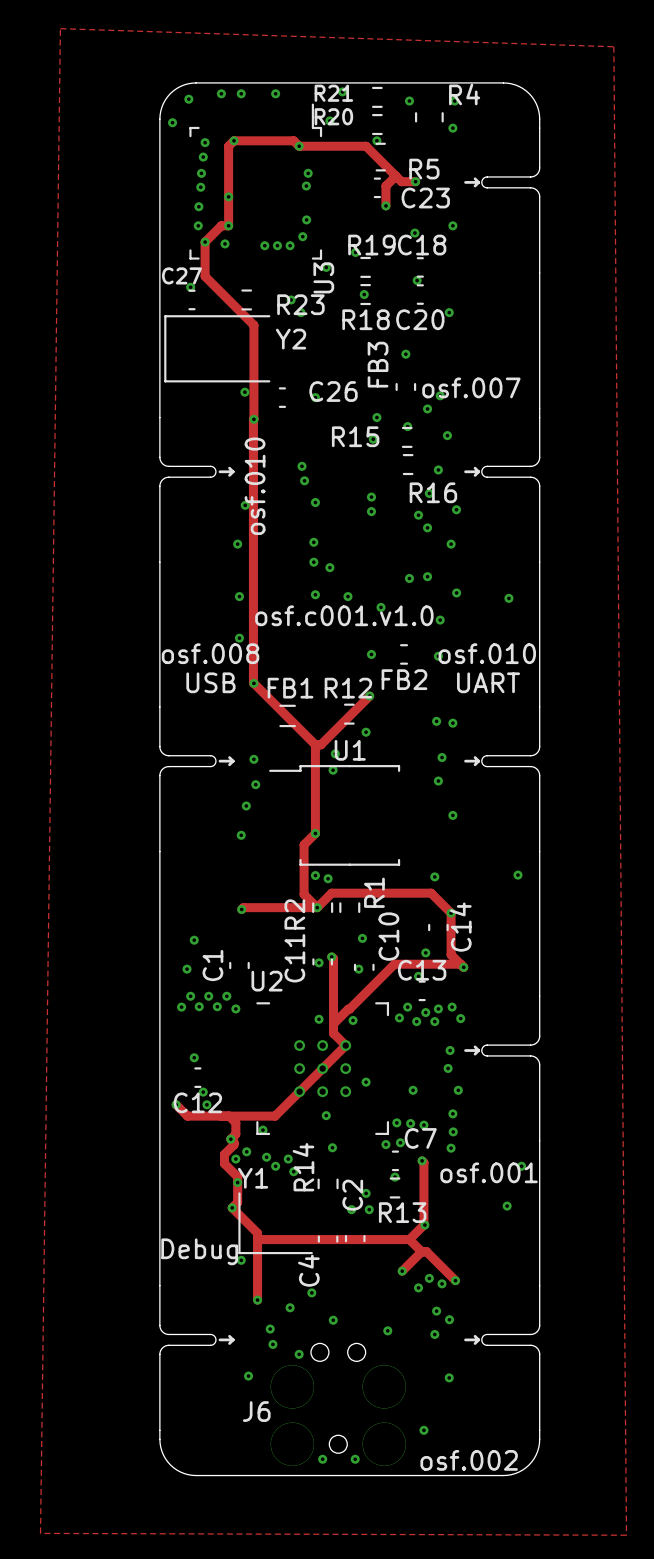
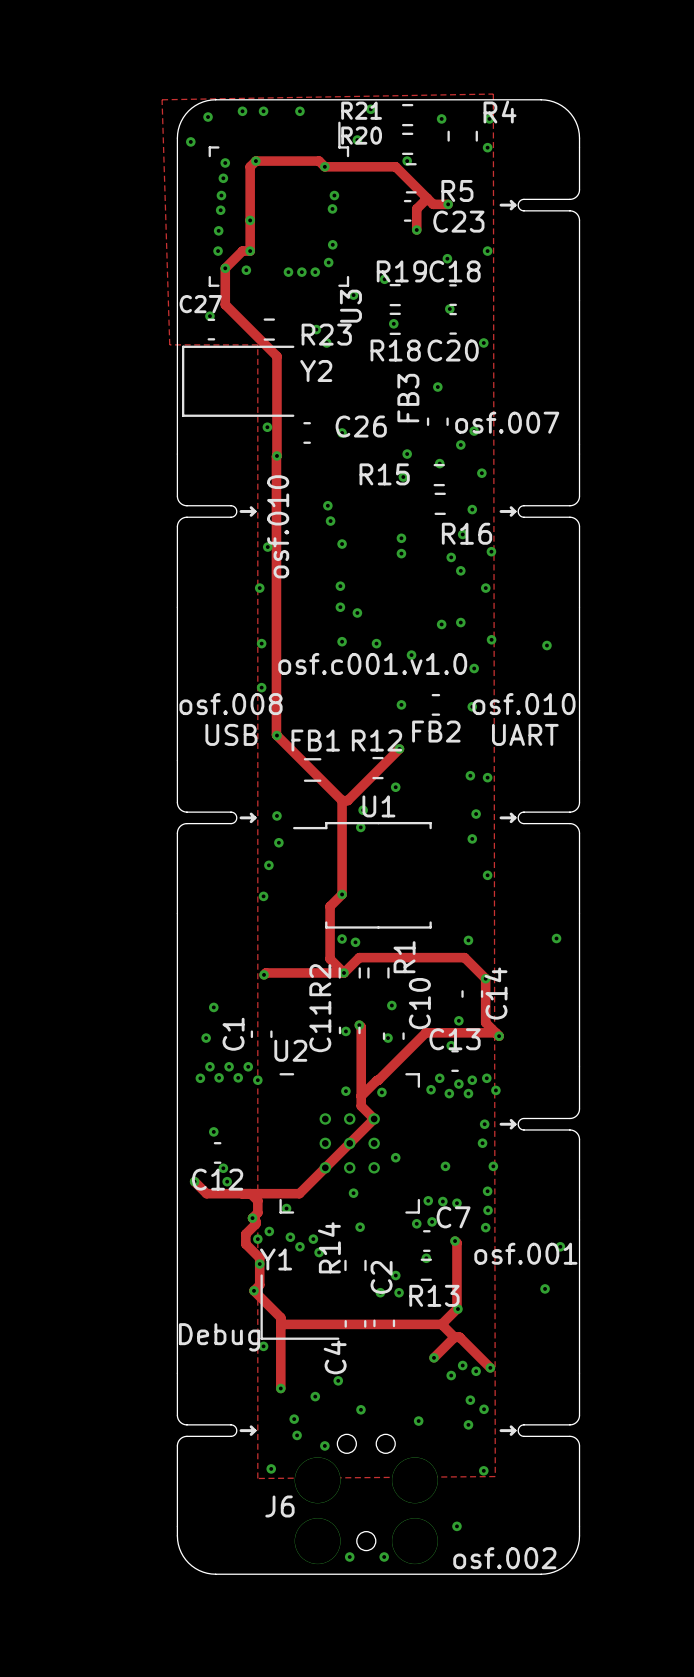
zone outline: (60, 28) (40, 1533) (626, 1535) (613, 46) (60, 28) -> none
zone outline: none -> (493, 94) (162, 99) (169, 344) (257, 344) (257, 1478) (495, 1476) (493, 94)

